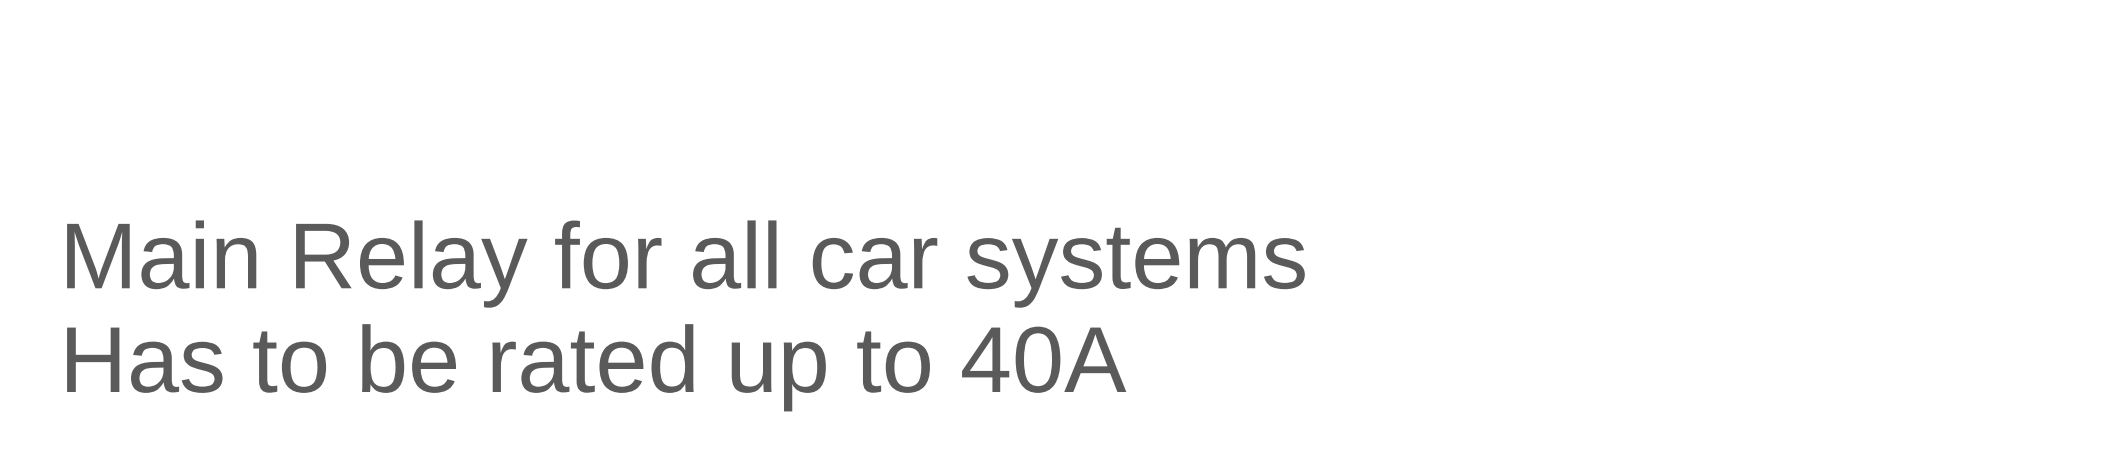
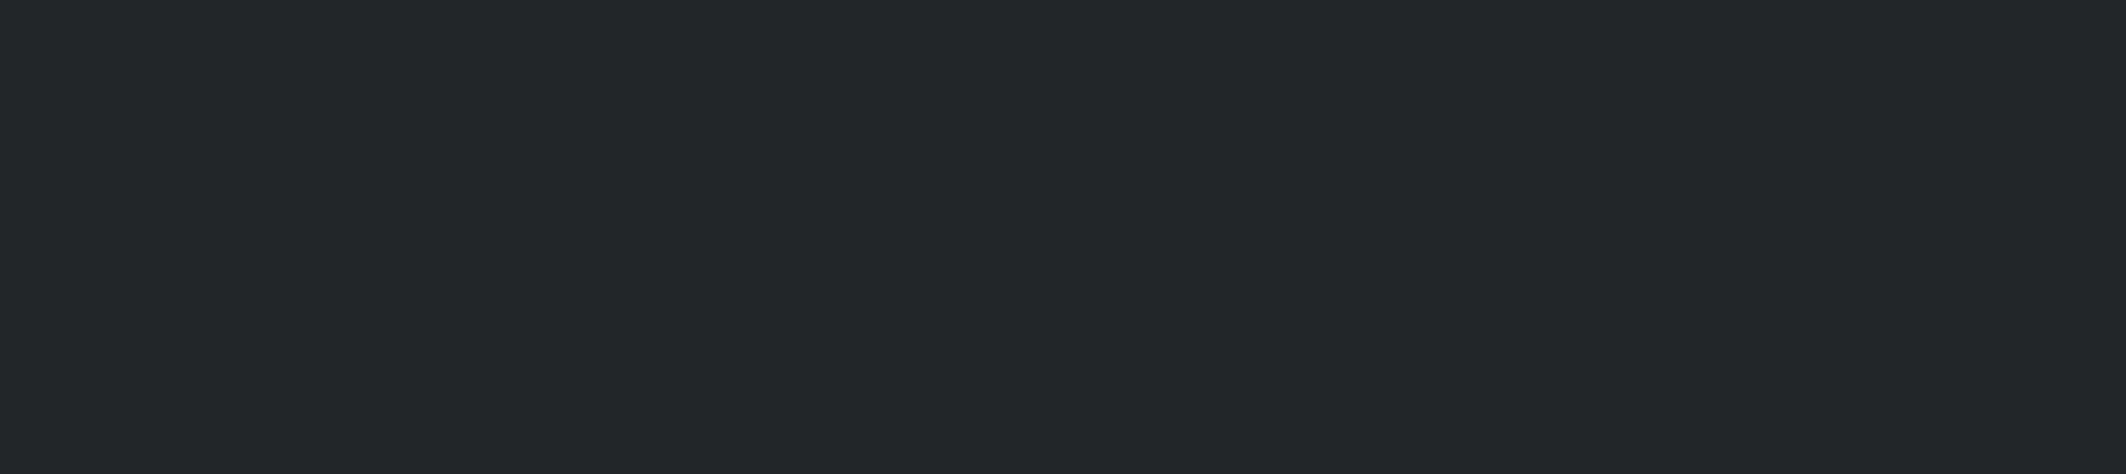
text: Main Relay for all car systems (685, 264) -> none
text: Has to be rated up to 40A (596, 367) -> none

